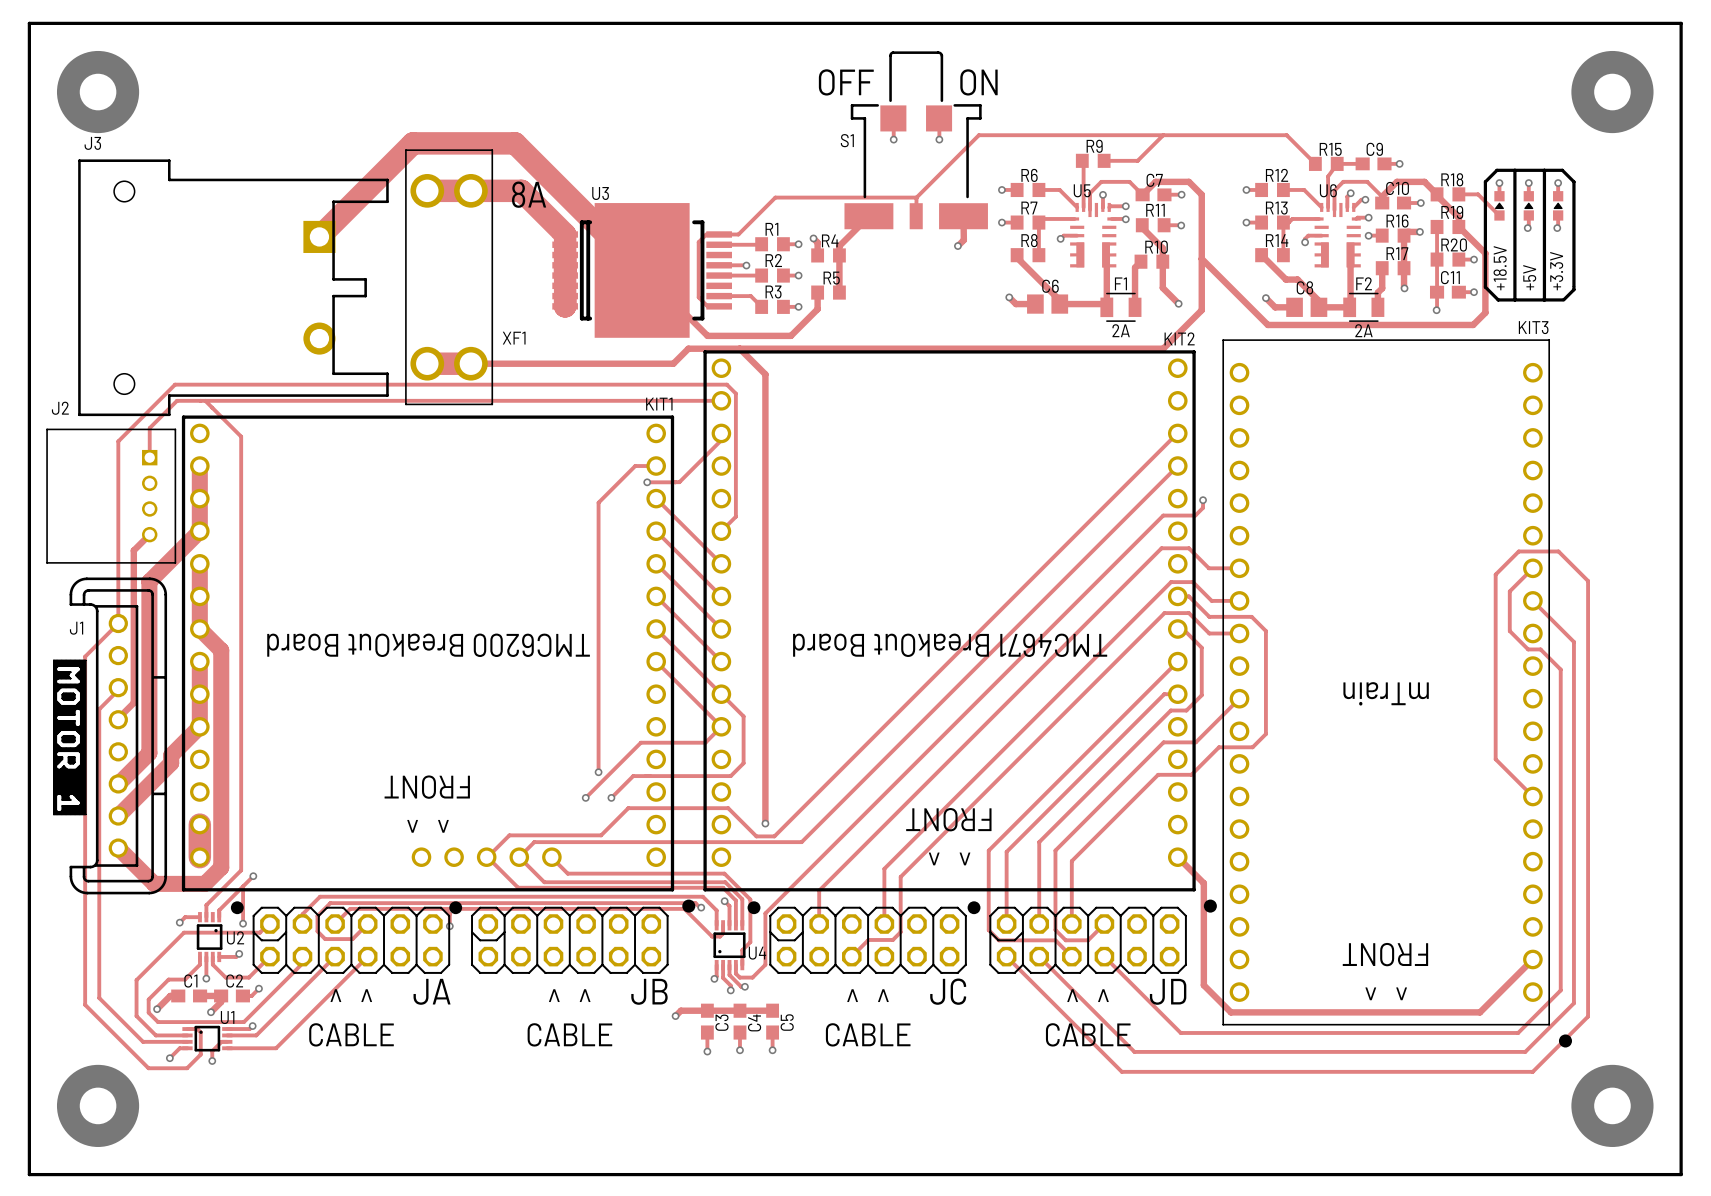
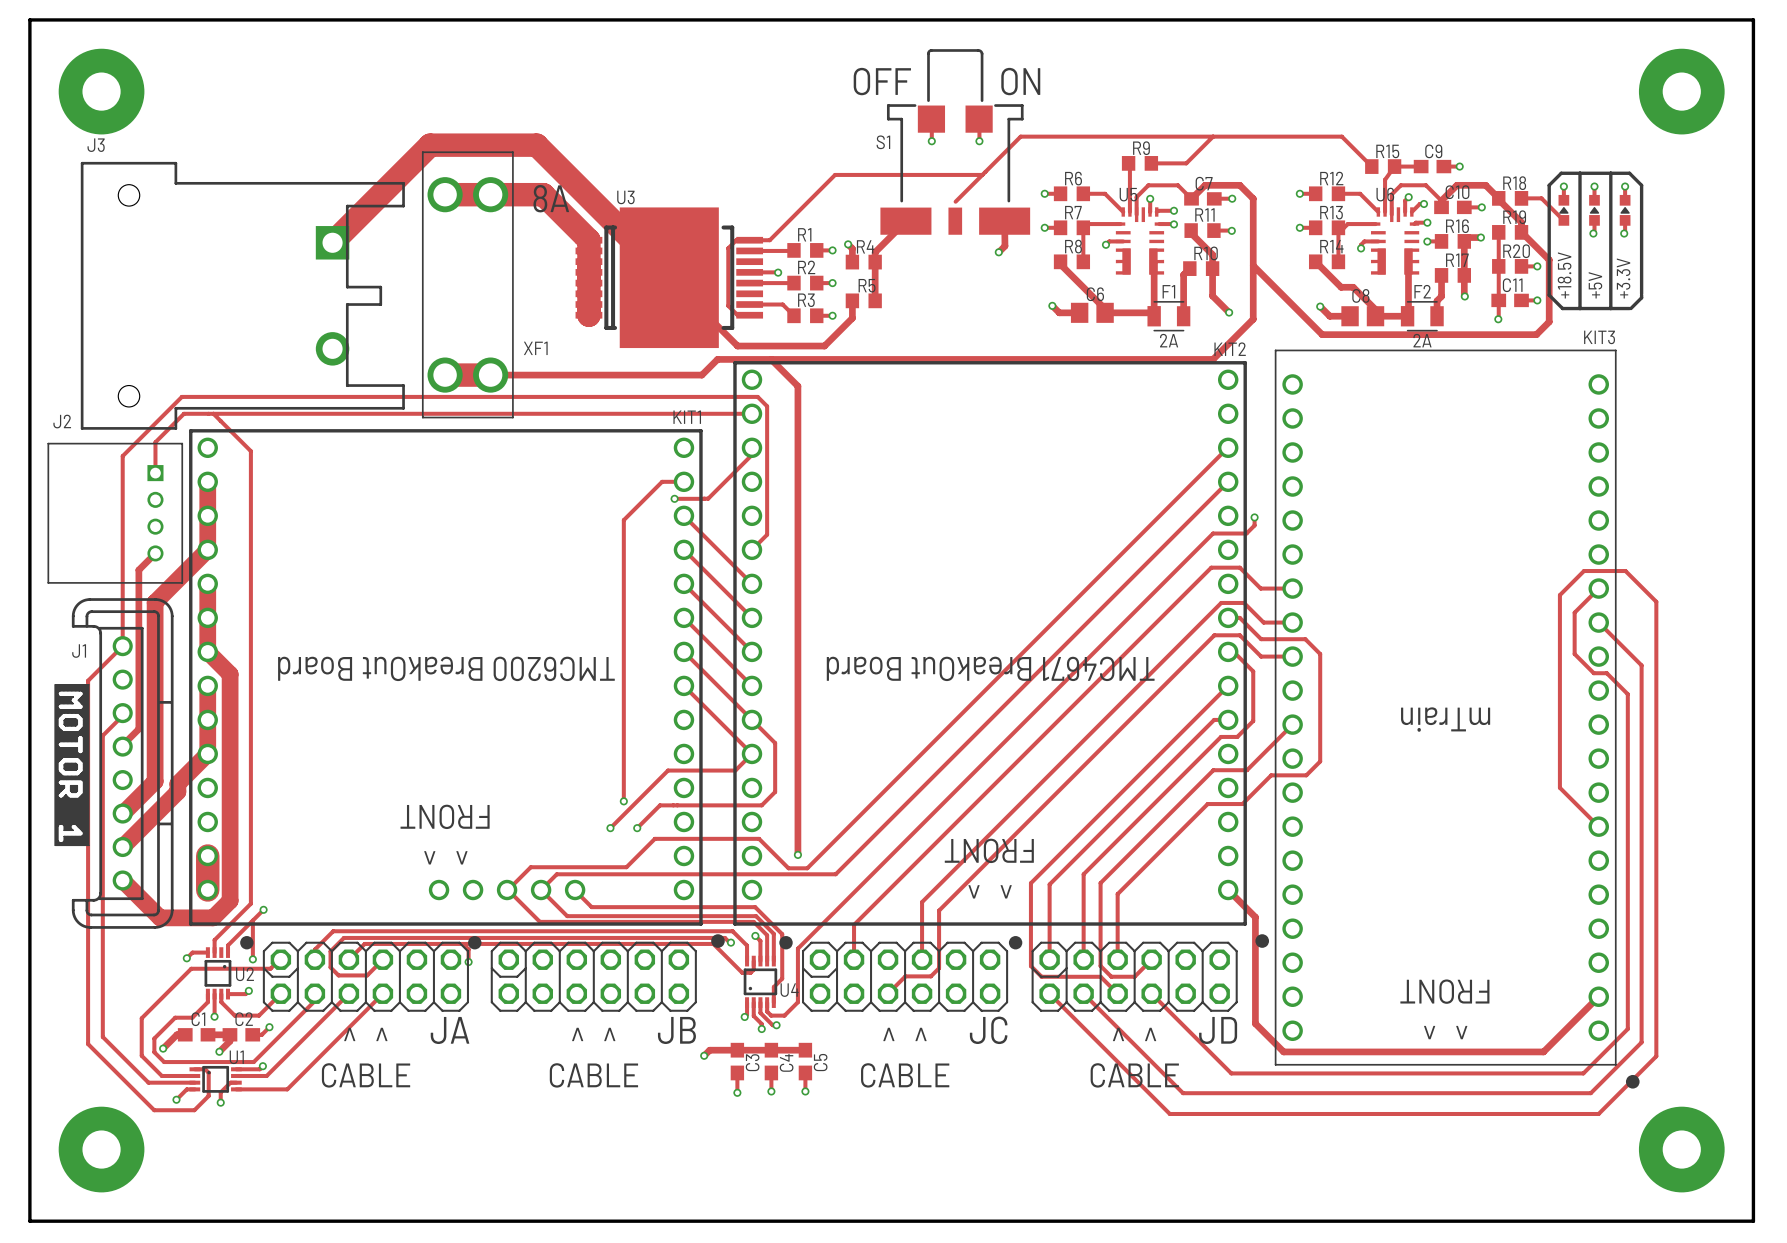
track: (775, 197) (916, 197) (916, 216) -> (808, 201) (835, 174) (982, 174)

